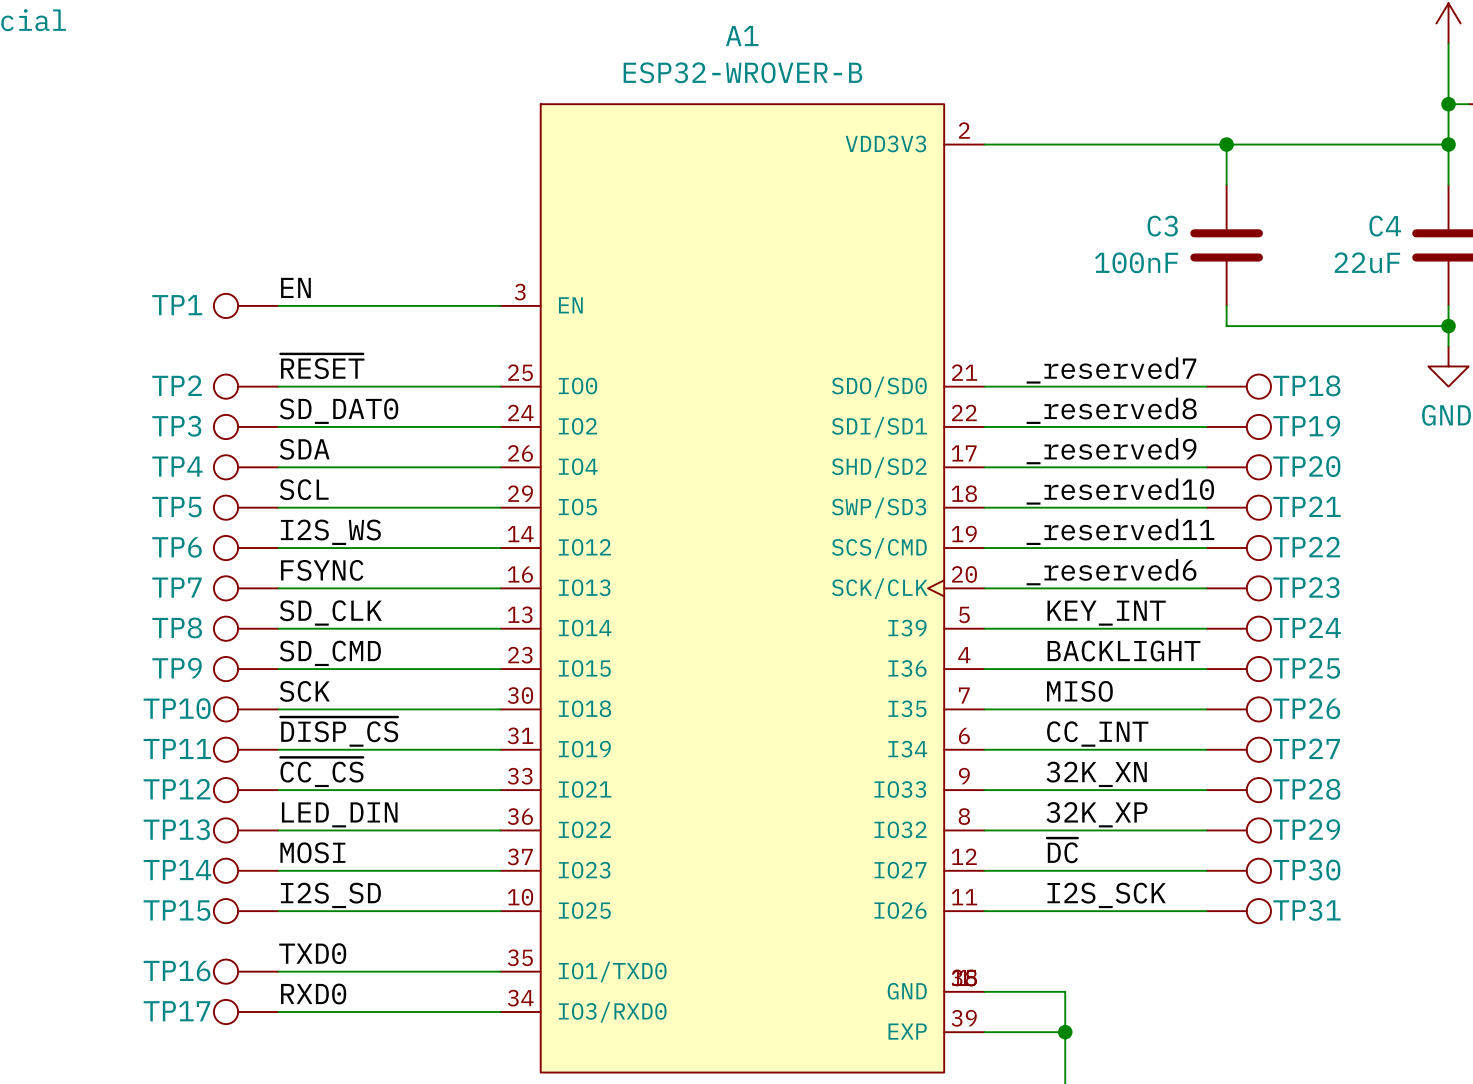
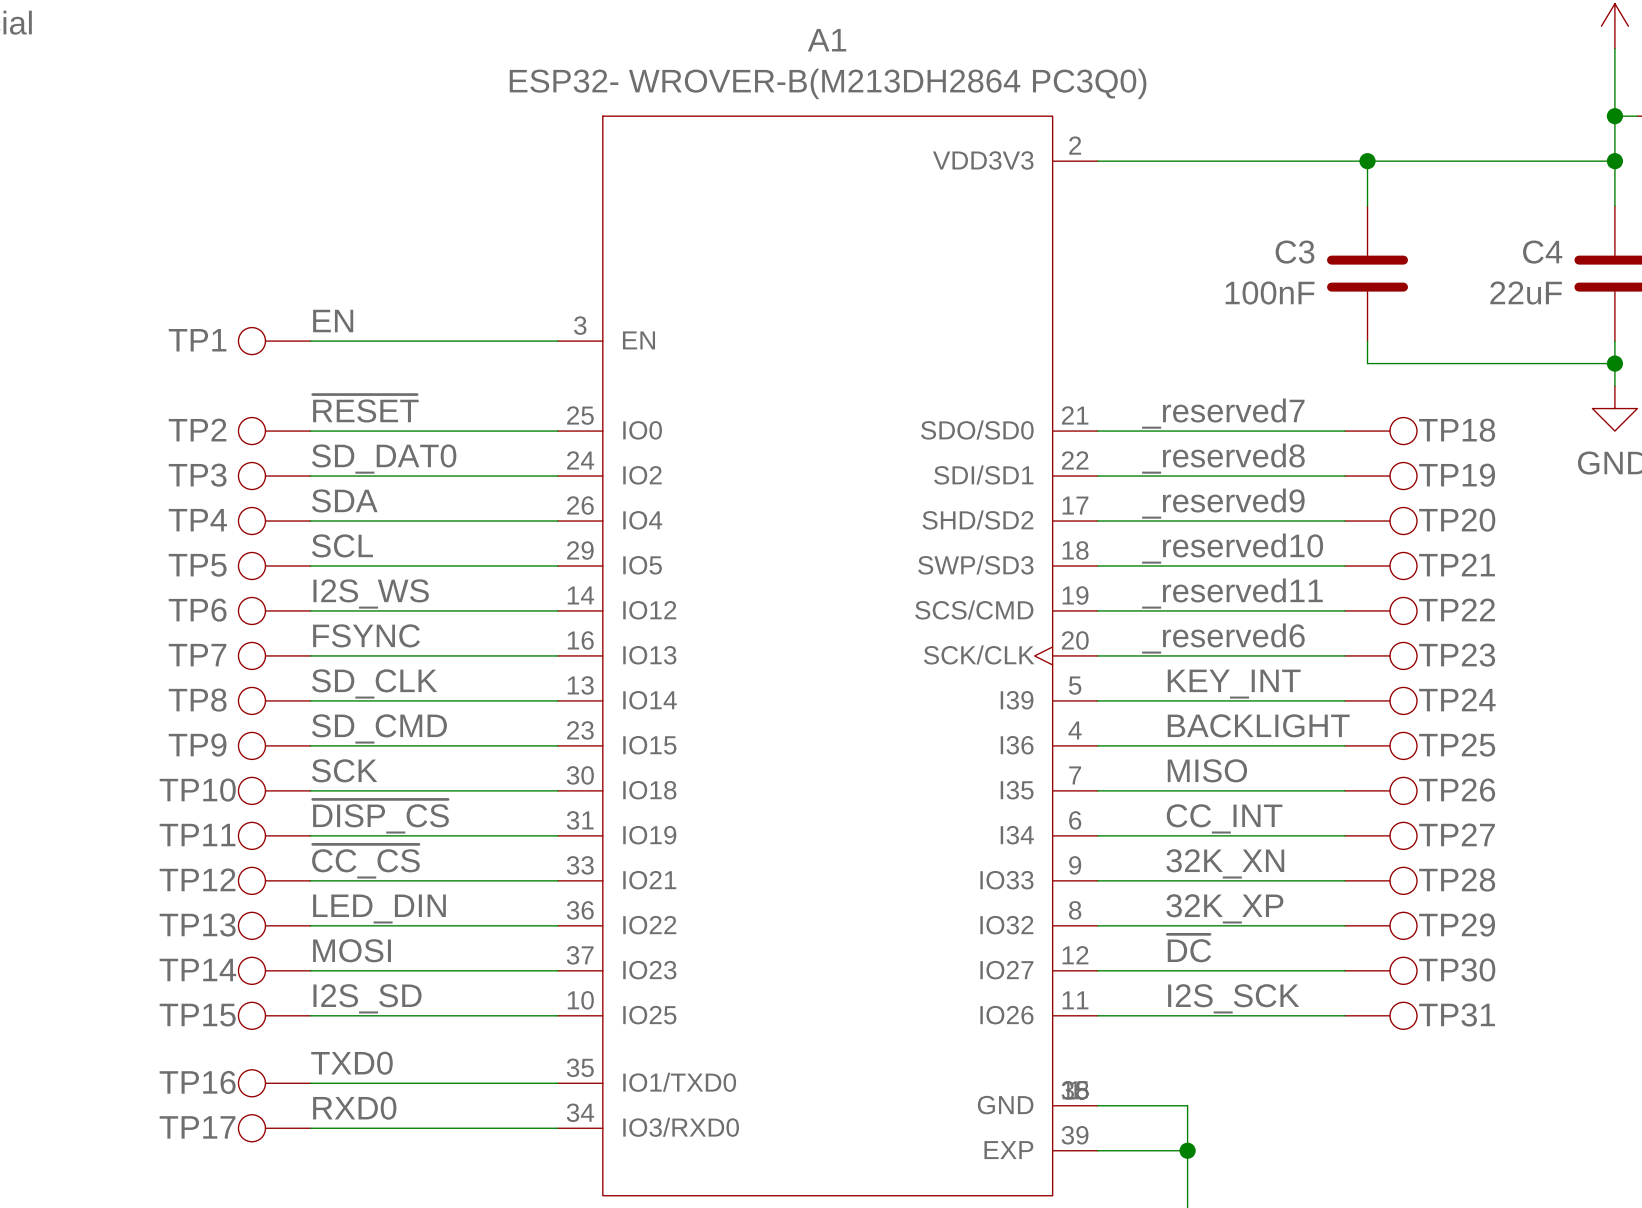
A1 value: ESP32-WROVER-B (742, 72) -> ESP32- WROVER-B(M213DH2864 PC3Q0) (828, 83)

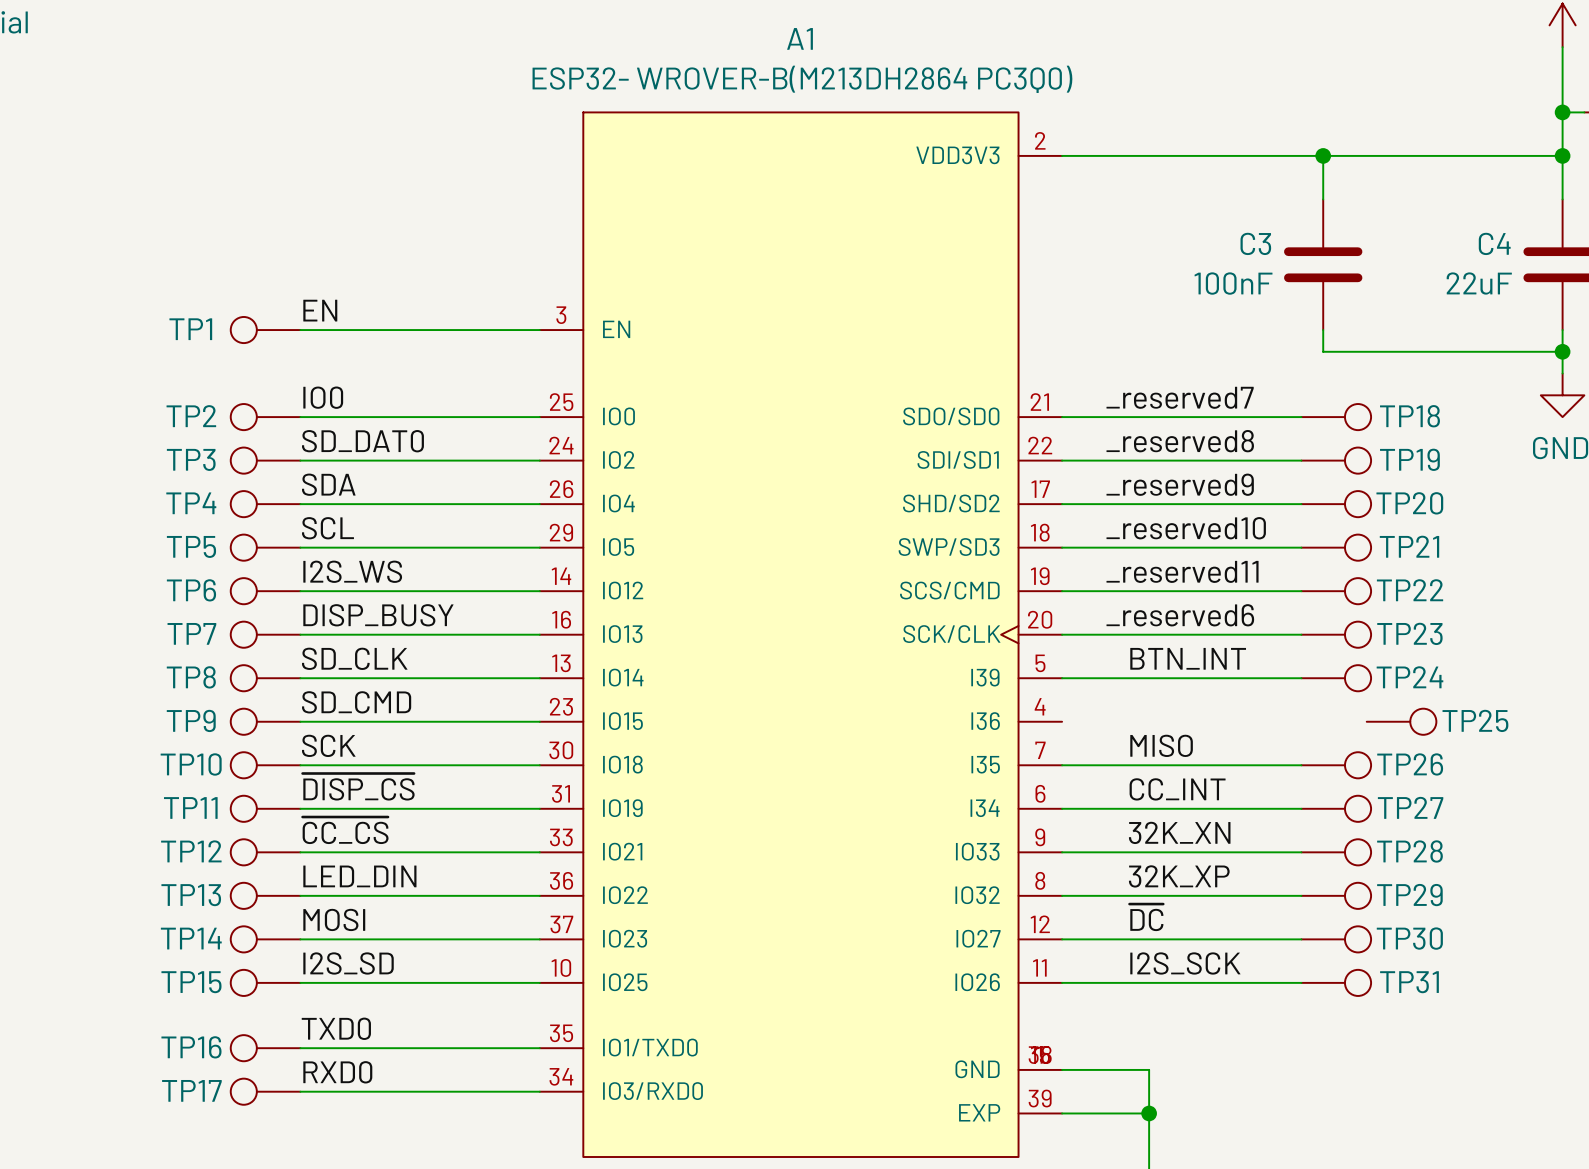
label: ~{RESET} (365, 408) -> IO0 (323, 397)
label: FSYNC (366, 635) -> DISP_BUSY (378, 615)
label: KEY_INT (1234, 684) -> BTN_INT (1188, 658)
label: BACKLIGHT (1258, 725) -> none
wire: (1097, 745) (1345, 745) -> none
TP25 position: (1381, 745) -> (1401, 721)

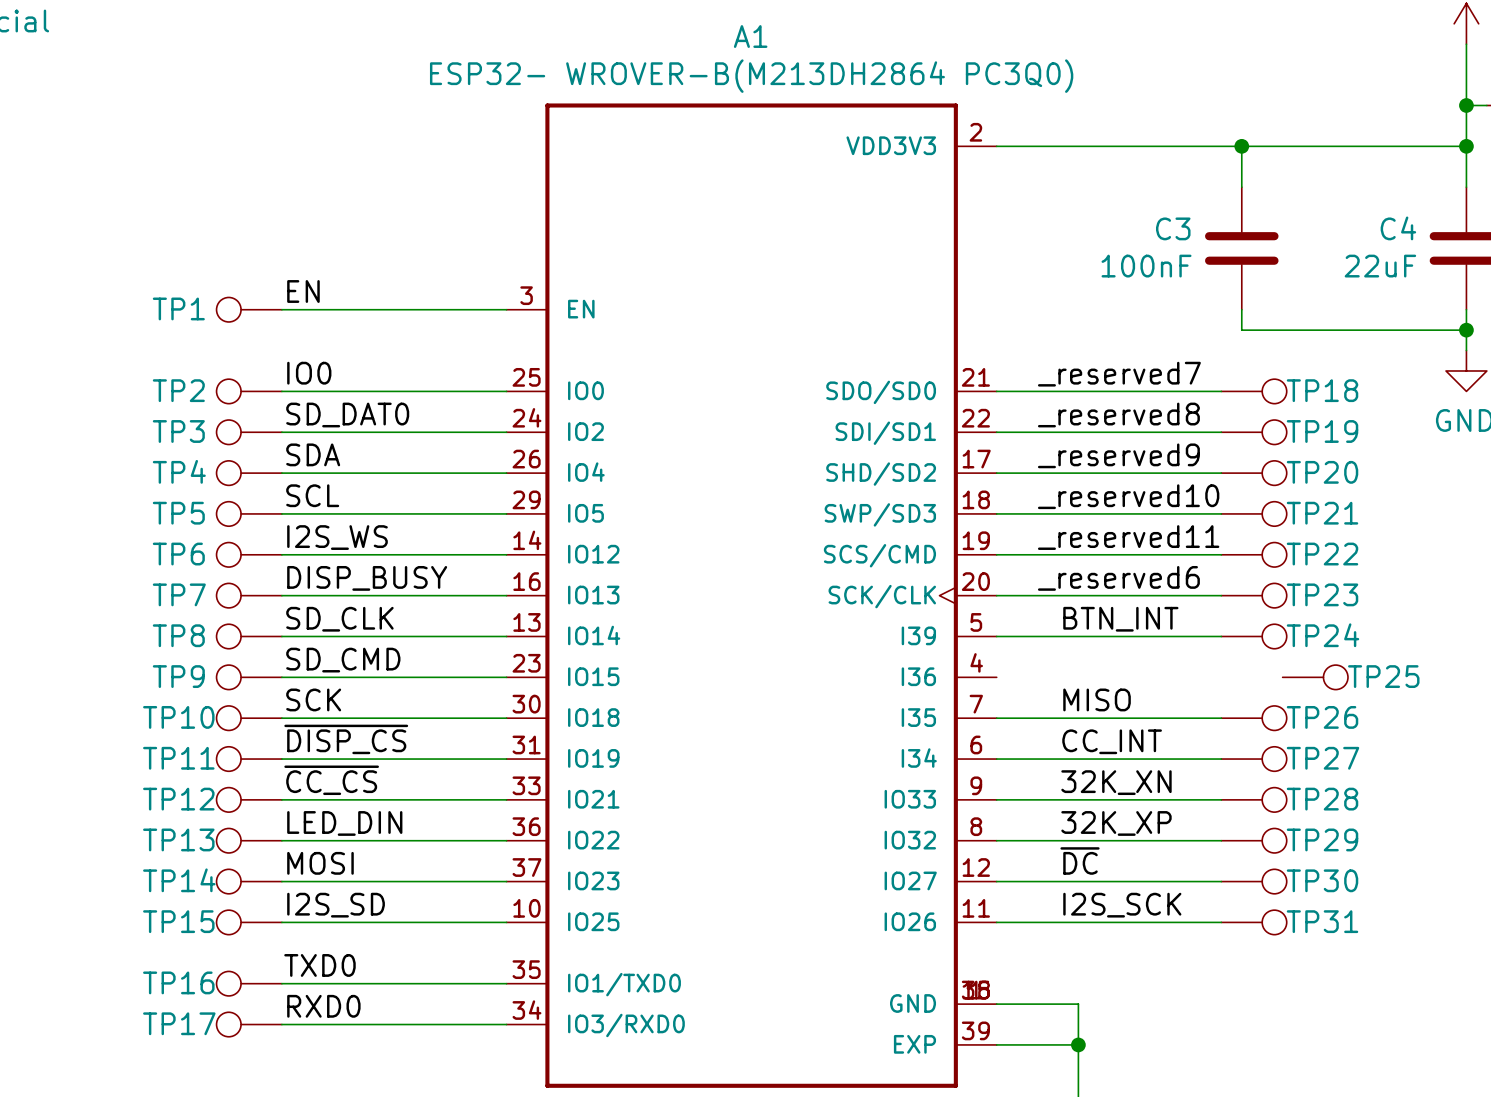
A1 symbol: [539, 112, 1063, 1157] -> [506, 103, 997, 1088]

